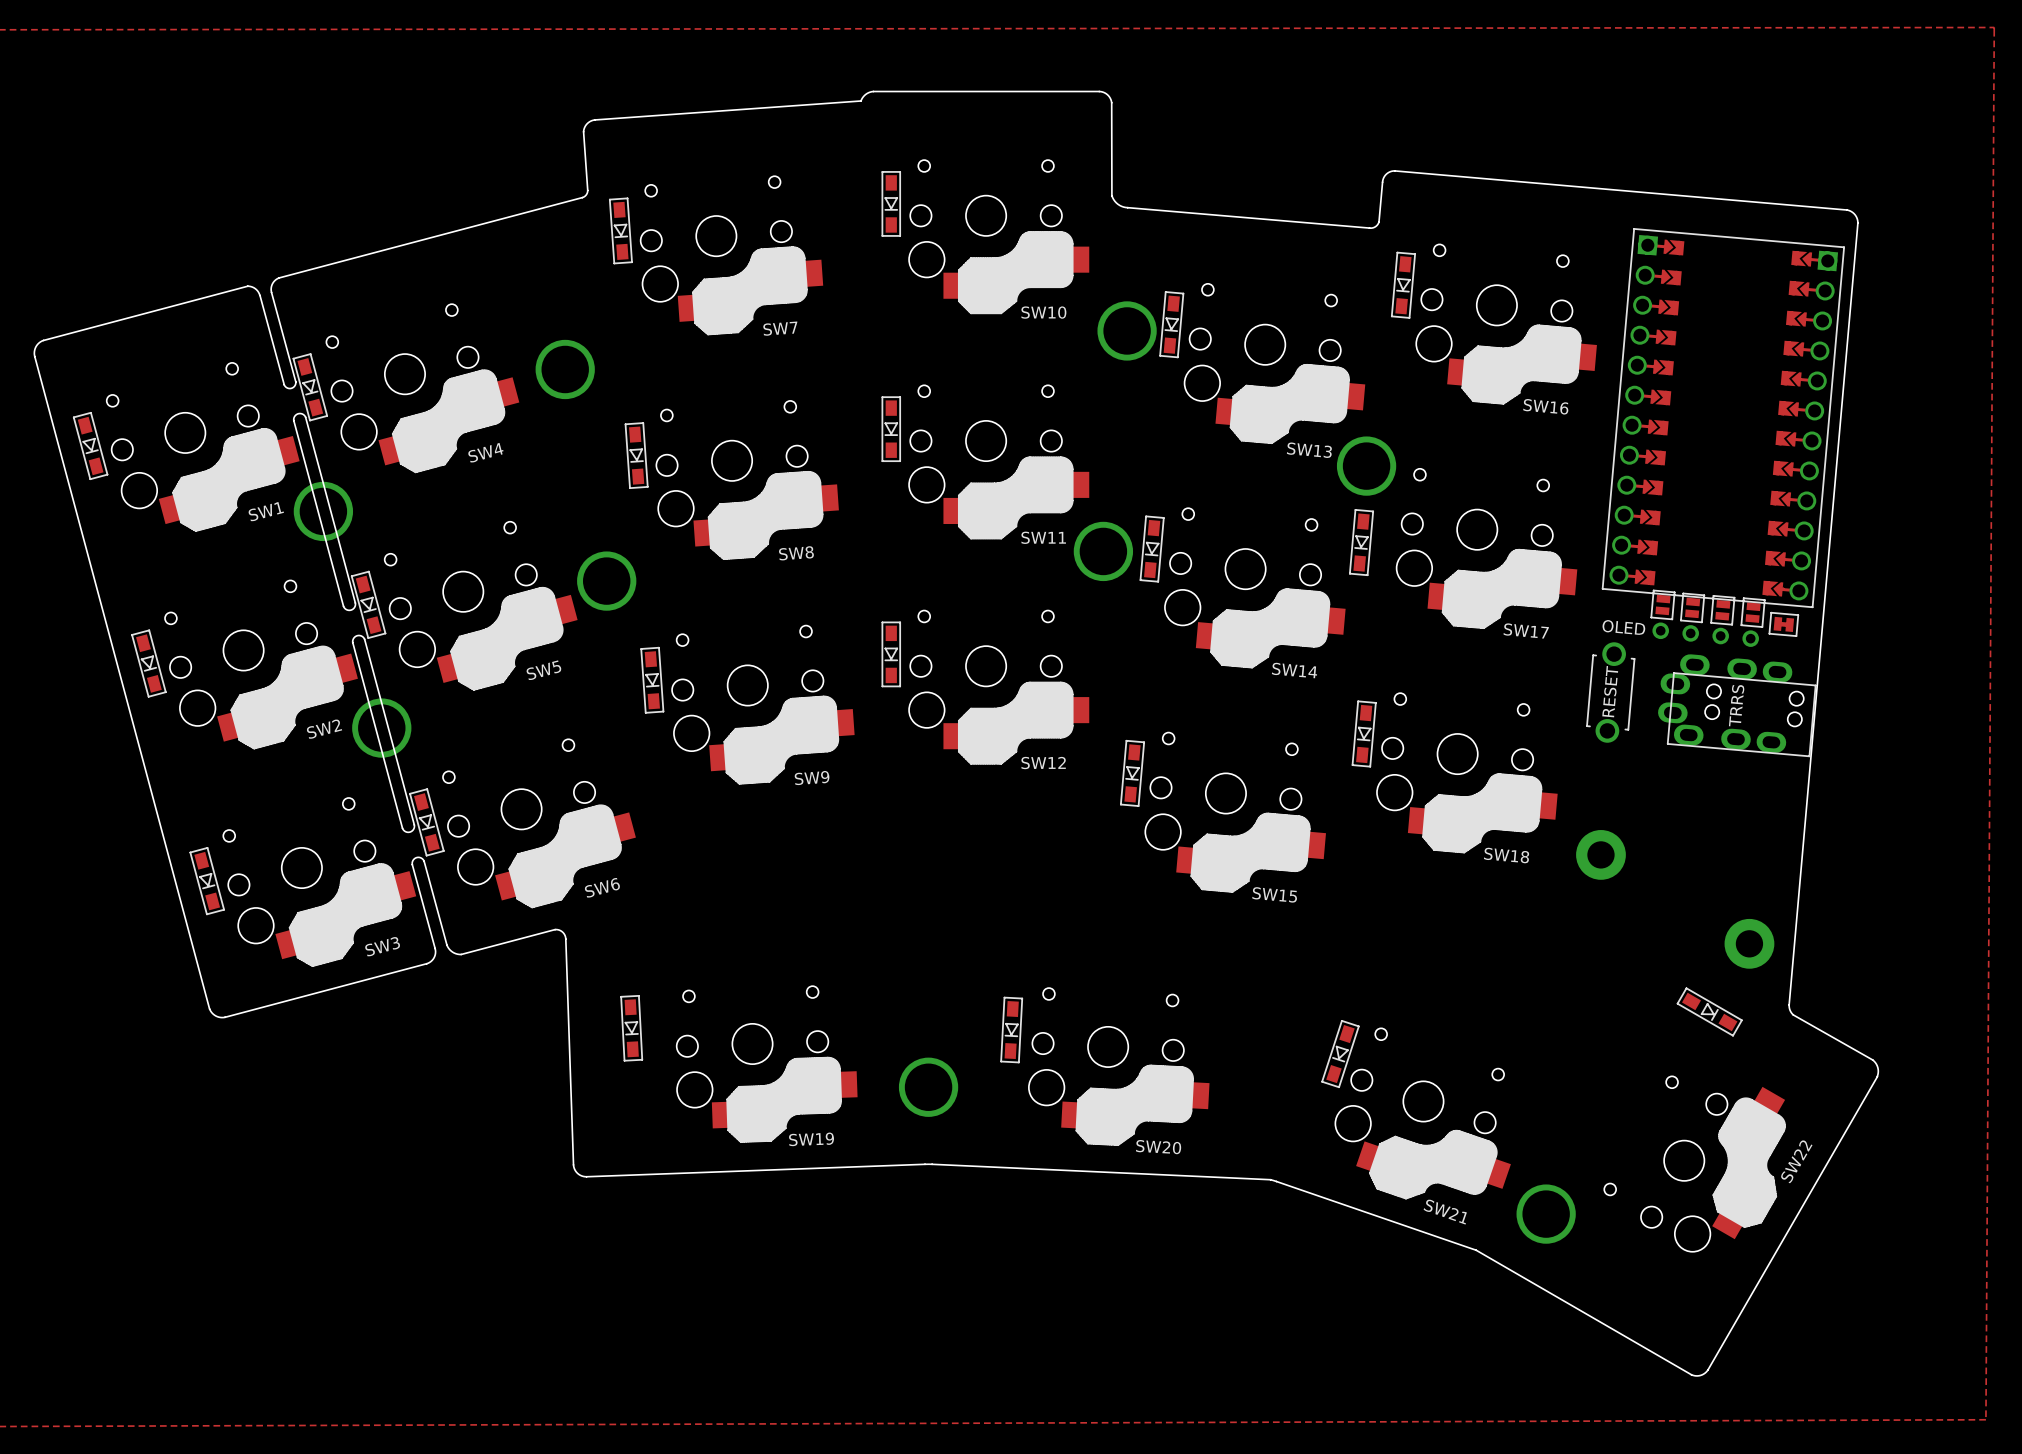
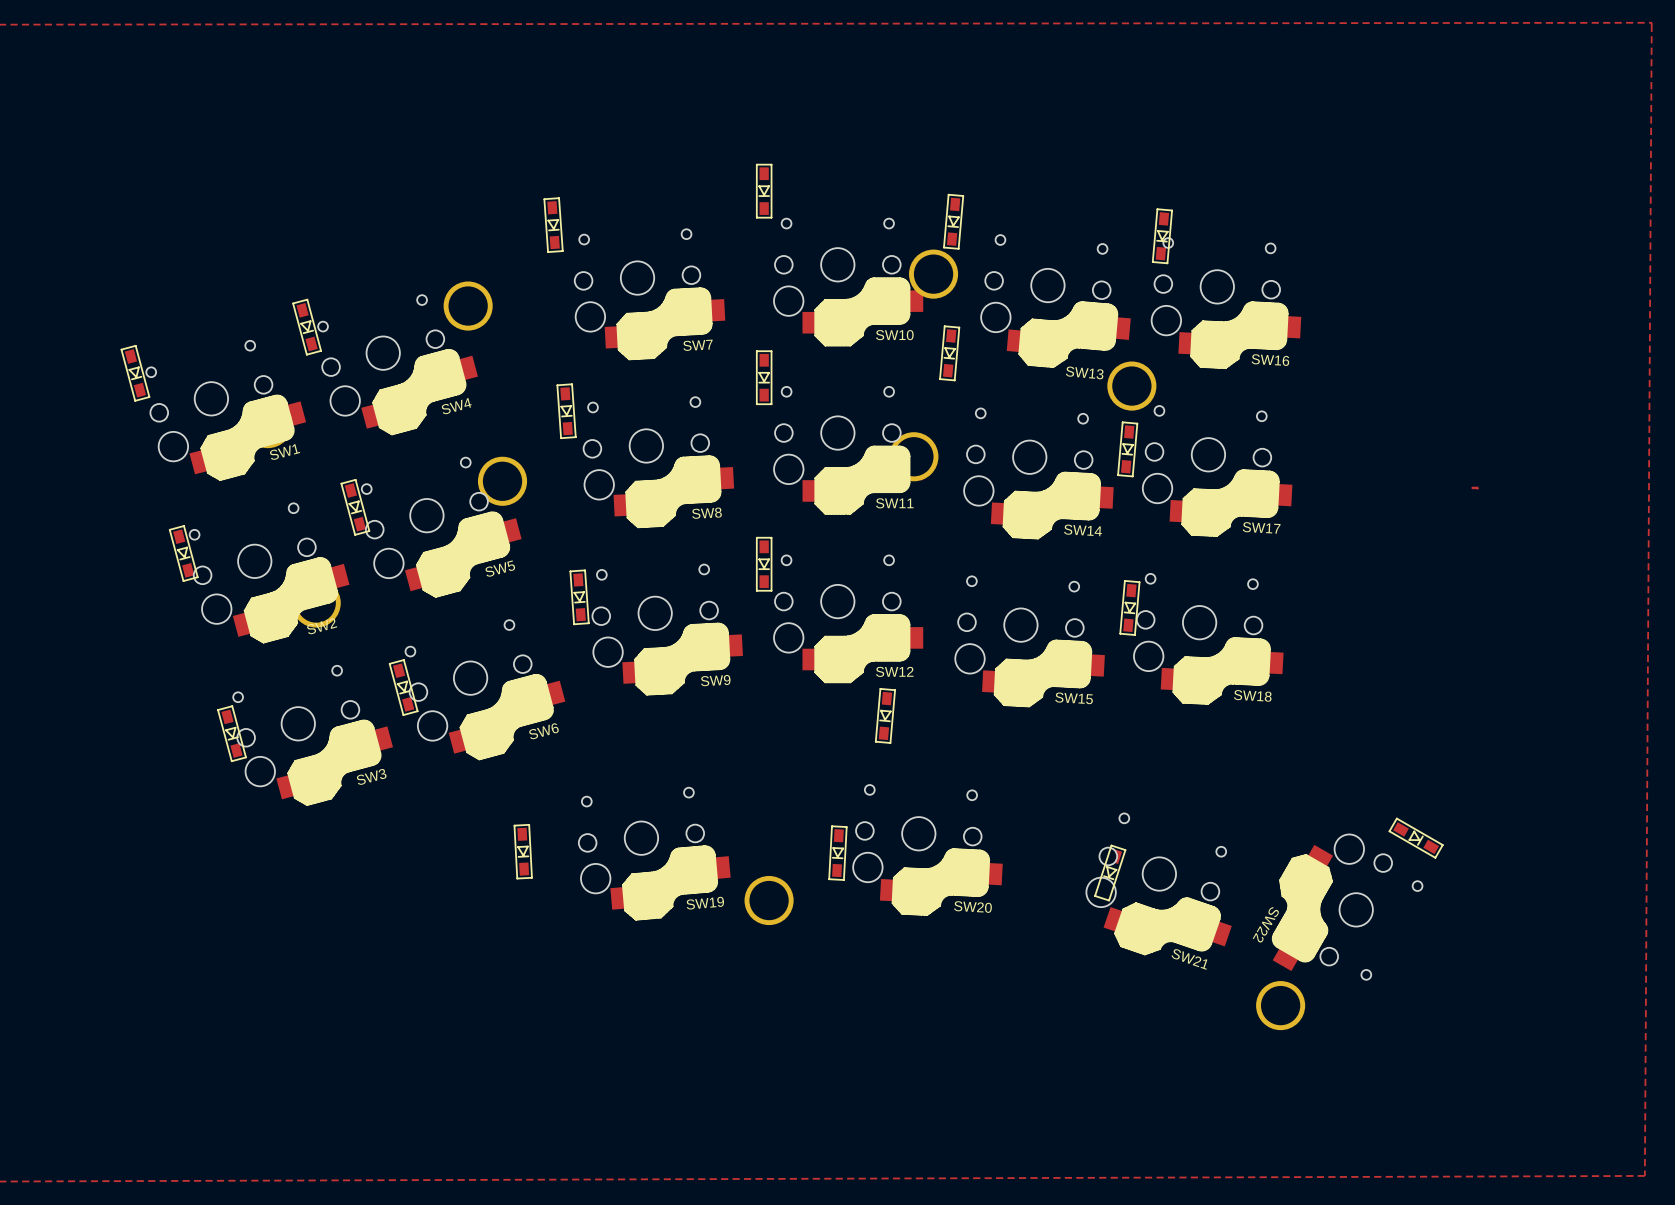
SW7 footprint: [640, 176, 824, 336] -> [574, 229, 726, 361]
part position: (891, 203) -> (764, 191)
part position: (620, 230) -> (553, 225)
SW10 position: (999, 237) -> (848, 282)
SW16 footprint: [1416, 244, 1597, 405] -> [1151, 238, 1302, 369]
part: none -> (953, 221)
board edge: (259, 295) (255, 288) (247, 286) (43, 340) (36, 345) (34, 353) (209, 1009) (215, 1015) (225, 1017) (431, 961) (434, 956) (435, 950) (412, 863) (414, 859) (419, 857) (424, 861) (447, 945) (454, 953) (461, 954) (555, 929) (560, 930) (564, 934) (573, 1164) (576, 1172) (581, 1175) (928, 1164) (1270, 1179) (1476, 1250) (1695, 1375) (1703, 1374) (1707, 1369) (1877, 1076) -> none
board edge: (259, 295) (284, 384) (287, 388) (292, 388) (295, 381) (271, 290) (272, 283) (277, 278) (583, 197) (587, 190) (583, 131) (586, 124) (591, 120) (860, 100) (865, 94) (873, 91) (1103, 92) (1108, 95) (1111, 102) (1111, 195) (1117, 204) (1125, 207) (1371, 228) (1379, 221) (1383, 177) (1389, 172) (1395, 170) (1850, 210) (1855, 215) (1857, 223) (1789, 1006) (1793, 1014) (1872, 1059) (1877, 1067) (1877, 1076) -> none
SW10 name position: SW10 (1043, 312) -> SW10 (894, 335)
part: (1171, 324) -> none
part position: (310, 387) -> (307, 327)
SW4 position: (422, 388) -> (398, 365)
SW8 footprint: [656, 400, 839, 561] -> [583, 397, 735, 529]
board edge: (305, 417) (355, 603) (354, 607) (350, 610) (346, 609) (343, 606) (293, 420) (298, 413) (305, 417) -> none
part: (1723, 418) -> none
part: none -> (949, 353)
part position: (891, 429) -> (764, 377)
part position: (90, 446) -> (135, 373)
SW1 position: (203, 447) -> (226, 410)
SW4 name position: SW4 (485, 452) -> SW4 (456, 406)
part position: (636, 455) -> (566, 411)
SW11 position: (999, 462) -> (848, 450)
SW17 footprint: [1396, 468, 1578, 630] -> [1142, 406, 1293, 537]
SW14 footprint: [1164, 508, 1346, 669] -> [964, 408, 1114, 540]
SW1 name position: SW1 (266, 511) -> SW1 (284, 452)
SW11 name position: SW11 (1043, 537) -> SW11 (894, 503)
part: (1152, 549) -> none
part position: (368, 604) -> (355, 507)
part: (1662, 604) -> none
SW5 position: (481, 606) -> (441, 527)
part: (1692, 607) -> none
part: (1722, 610) -> none
part: (1753, 612) -> none
part: (1783, 624) -> none
SW9 footprint: [672, 625, 855, 785] -> [592, 564, 743, 696]
part: (1705, 634) -> none
board edge: (364, 639) (414, 824) (413, 829) (409, 832) (405, 831) (402, 828) (352, 642) (357, 635) (364, 639) -> none
part position: (891, 654) -> (764, 564)
part position: (148, 663) -> (183, 553)
SW2 position: (261, 664) -> (269, 573)
SW5 name position: SW5 (543, 670) -> SW5 (500, 568)
part position: (652, 680) -> (579, 597)
SW12 position: (999, 687) -> (848, 619)
part: (1610, 692) -> none
SW18 footprint: [1376, 693, 1558, 854] -> [1133, 573, 1284, 705]
part: (1737, 705) -> none
SW15 footprint: [1145, 732, 1327, 893] -> [955, 576, 1105, 708]
SW12 name position: SW12 (1043, 763) -> SW12 (894, 671)
part position: (1132, 773) -> (885, 715)
part position: (426, 822) -> (403, 687)
SW6 position: (539, 823) -> (485, 690)
part: (1600, 854) -> none
SW18 name rotation: 0° (1506, 855) -> 2° counterclockwise (1252, 695)
part position: (207, 881) -> (232, 733)
SW3 position: (319, 882) -> (313, 735)
SW6 name position: SW6 (602, 887) -> SW6 (543, 731)
part: (1749, 943) -> none
SW3 name position: SW3 (382, 946) -> SW3 (371, 777)
SW19 footprint: [676, 986, 858, 1143] -> [578, 787, 731, 921]
SW20 position: (1119, 1067) -> (927, 850)
SW21 position: (1423, 1113) -> (1159, 884)
SW20 name position: SW20 (1158, 1147) -> SW20 (973, 907)
SW22 rotation: 0° (1695, 1164) -> 180° (1347, 907)
SW21 name position: SW21 (1445, 1211) -> SW21 (1189, 959)

